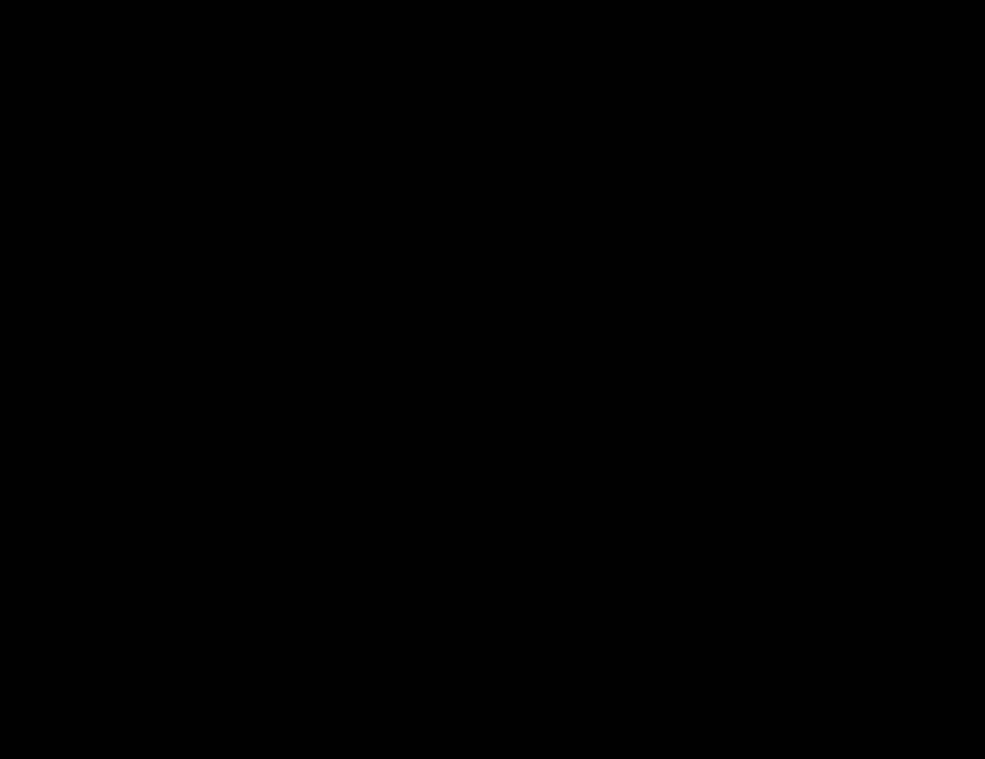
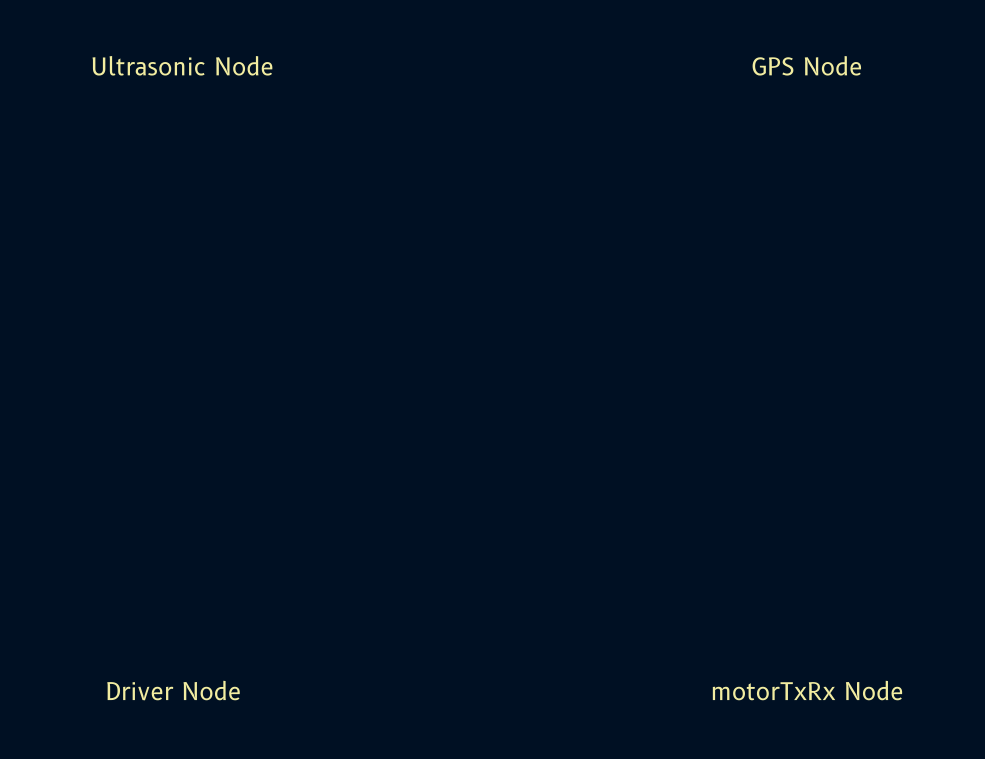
text: none -> Ultrasonic Node (182, 65)
text: none -> GPS Node (806, 65)
text: none -> Driver Node (173, 690)
text: none -> motorTxRx Node (807, 690)

